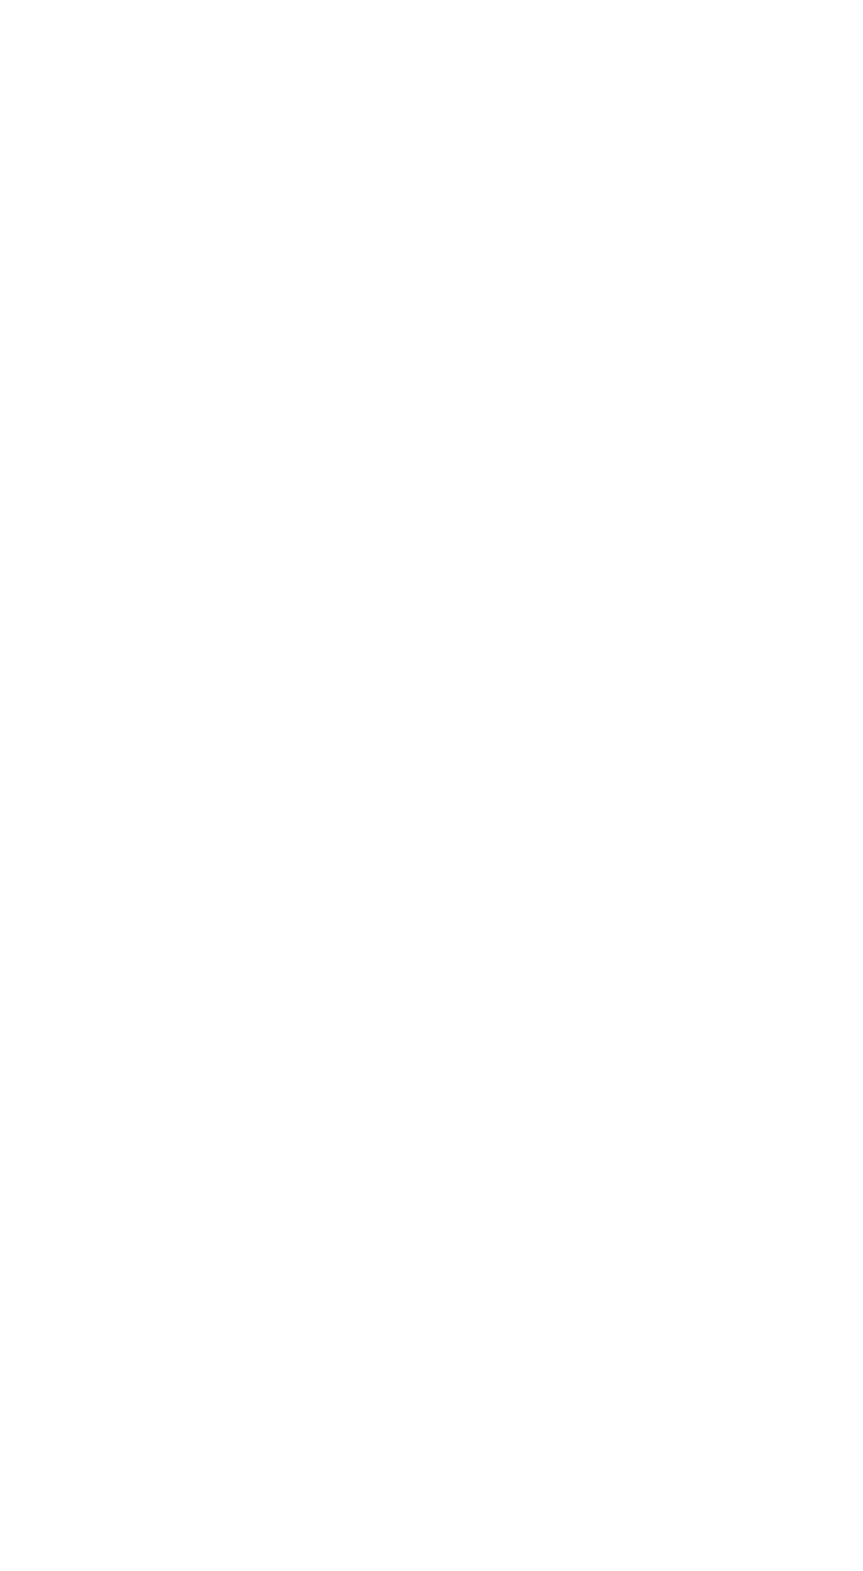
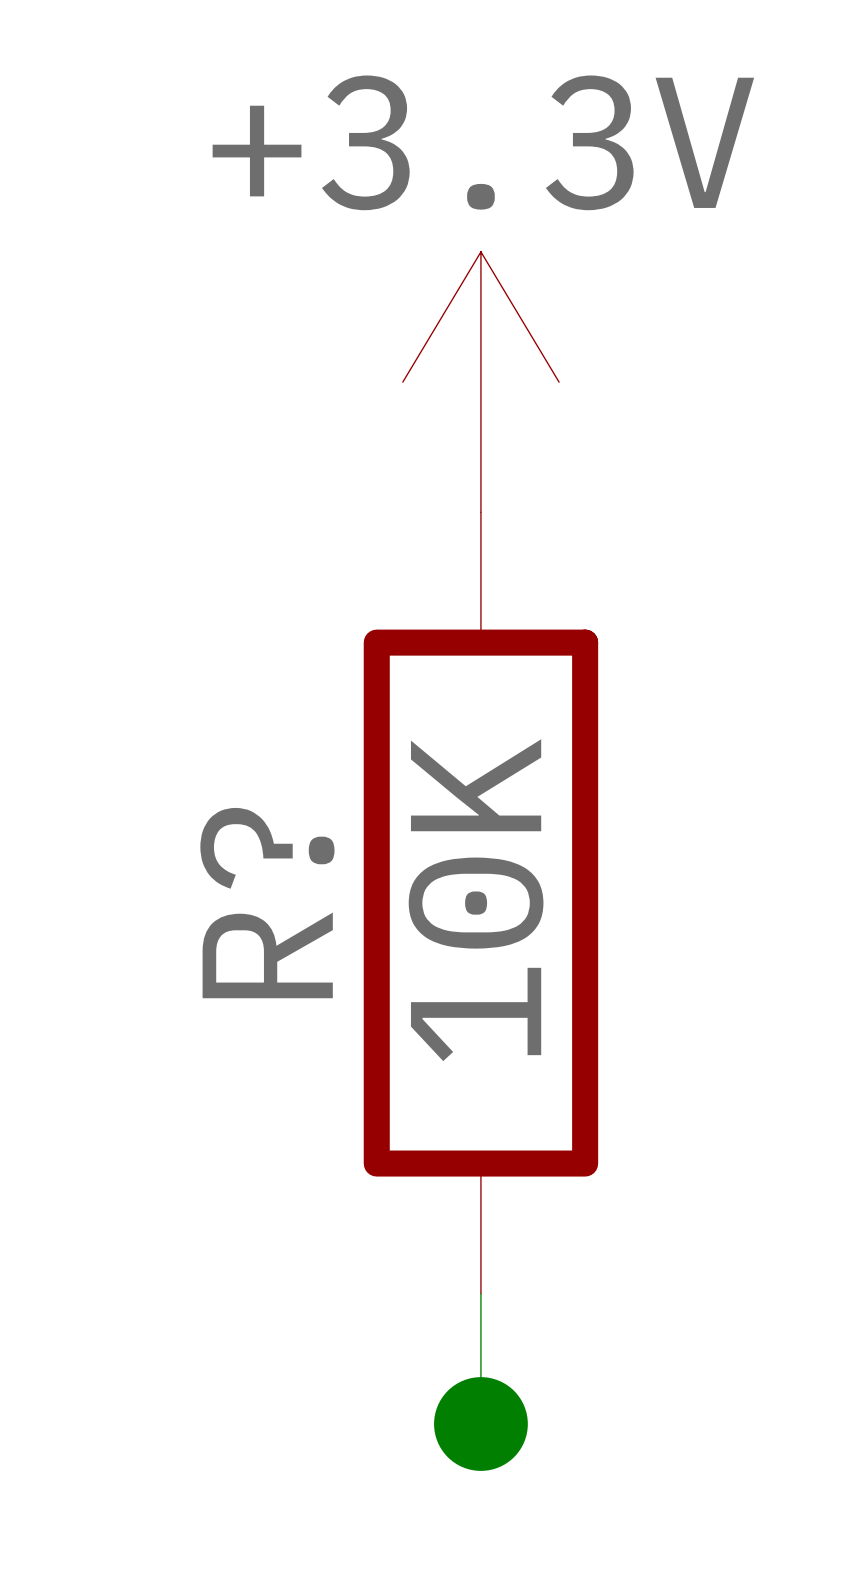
power symbol: none -> +3.3V (480, 382)
R?: none -> 10K (480, 903)
wire: none -> (480, 1293) (480, 1424)
junction: none -> (480, 1424)

